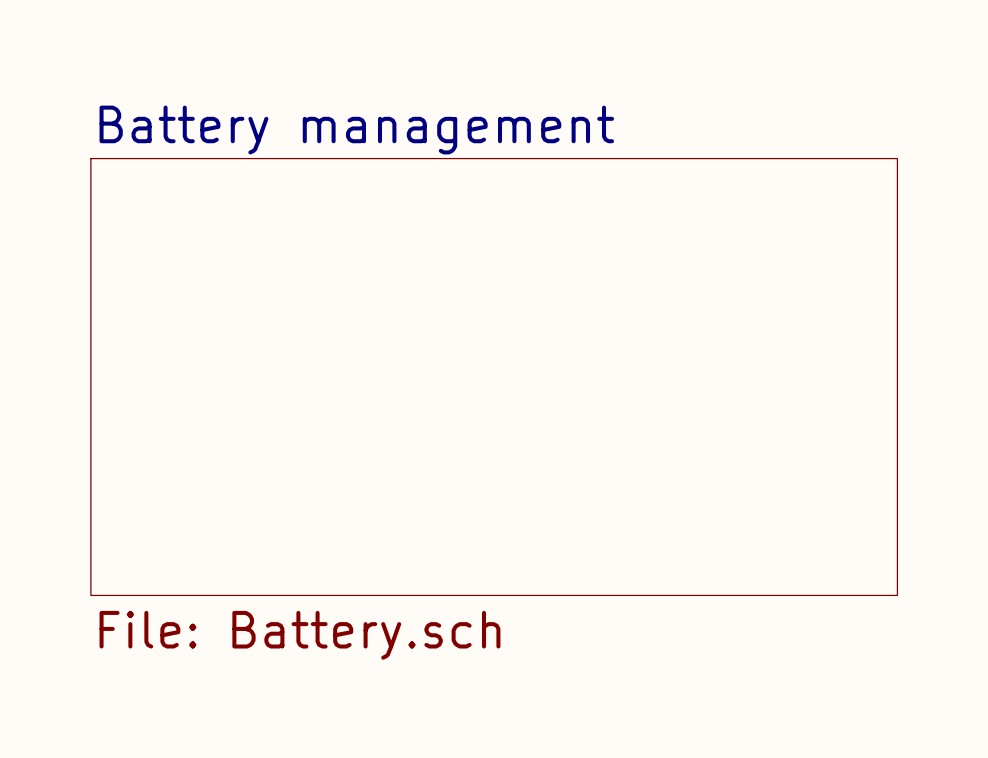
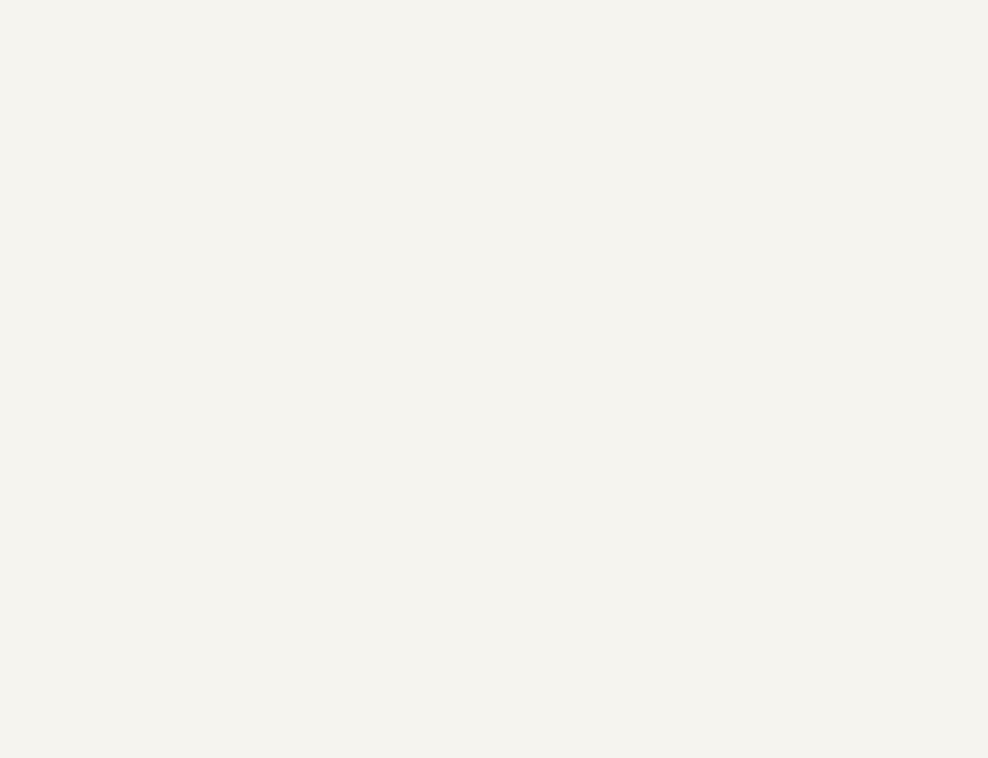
sheet Battery management: File: Battery.sch (494, 377) -> none

